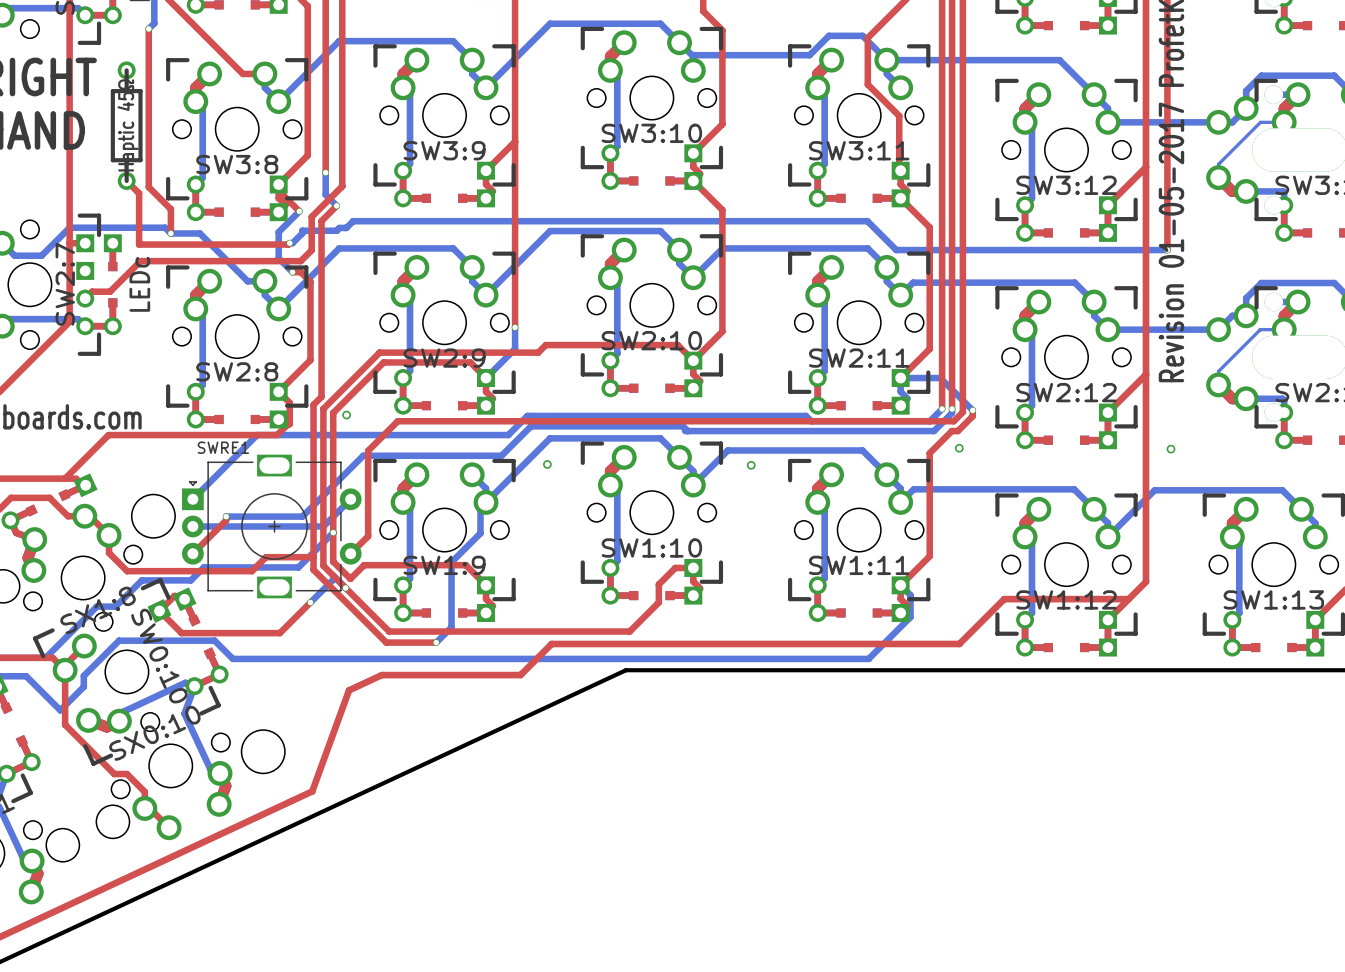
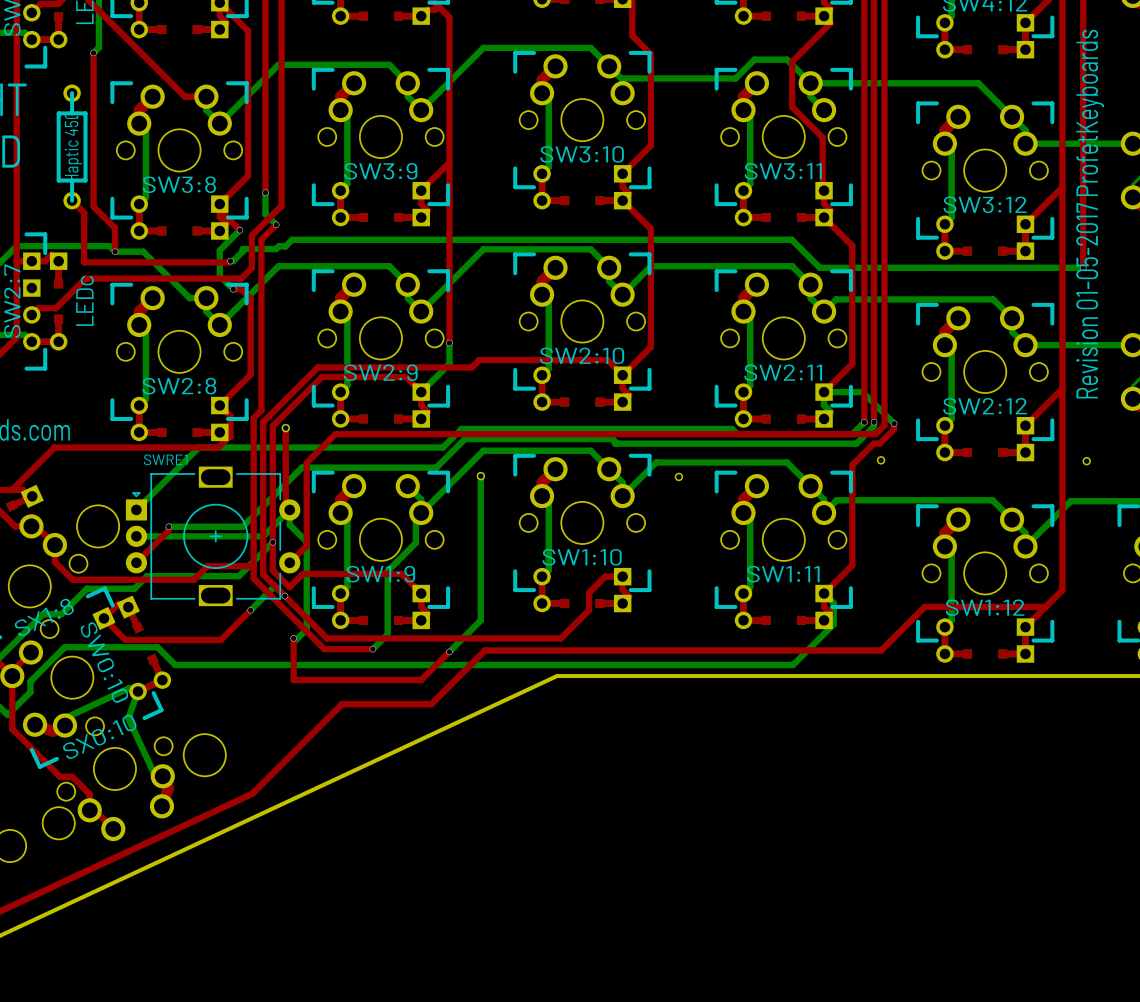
top track: none -> (51, 254) (45, 261) (31, 261)
top track: none -> (285, 428) (285, 505) (289, 509)
bottom track: none -> (480, 476) (480, 620) (449, 651)
bottom track: none -> (289, 509) (289, 524) (306, 541) (306, 629) (295, 640) (293, 638)
top track: none -> (293, 638) (293, 680) (421, 680) (449, 651)
via: none -> (293, 638)
via: none -> (449, 651)
top track: (520, 675) (381, 675) (349, 690) (312, 791) -> (454, 680) (431, 704) (341, 704) (252, 793)

